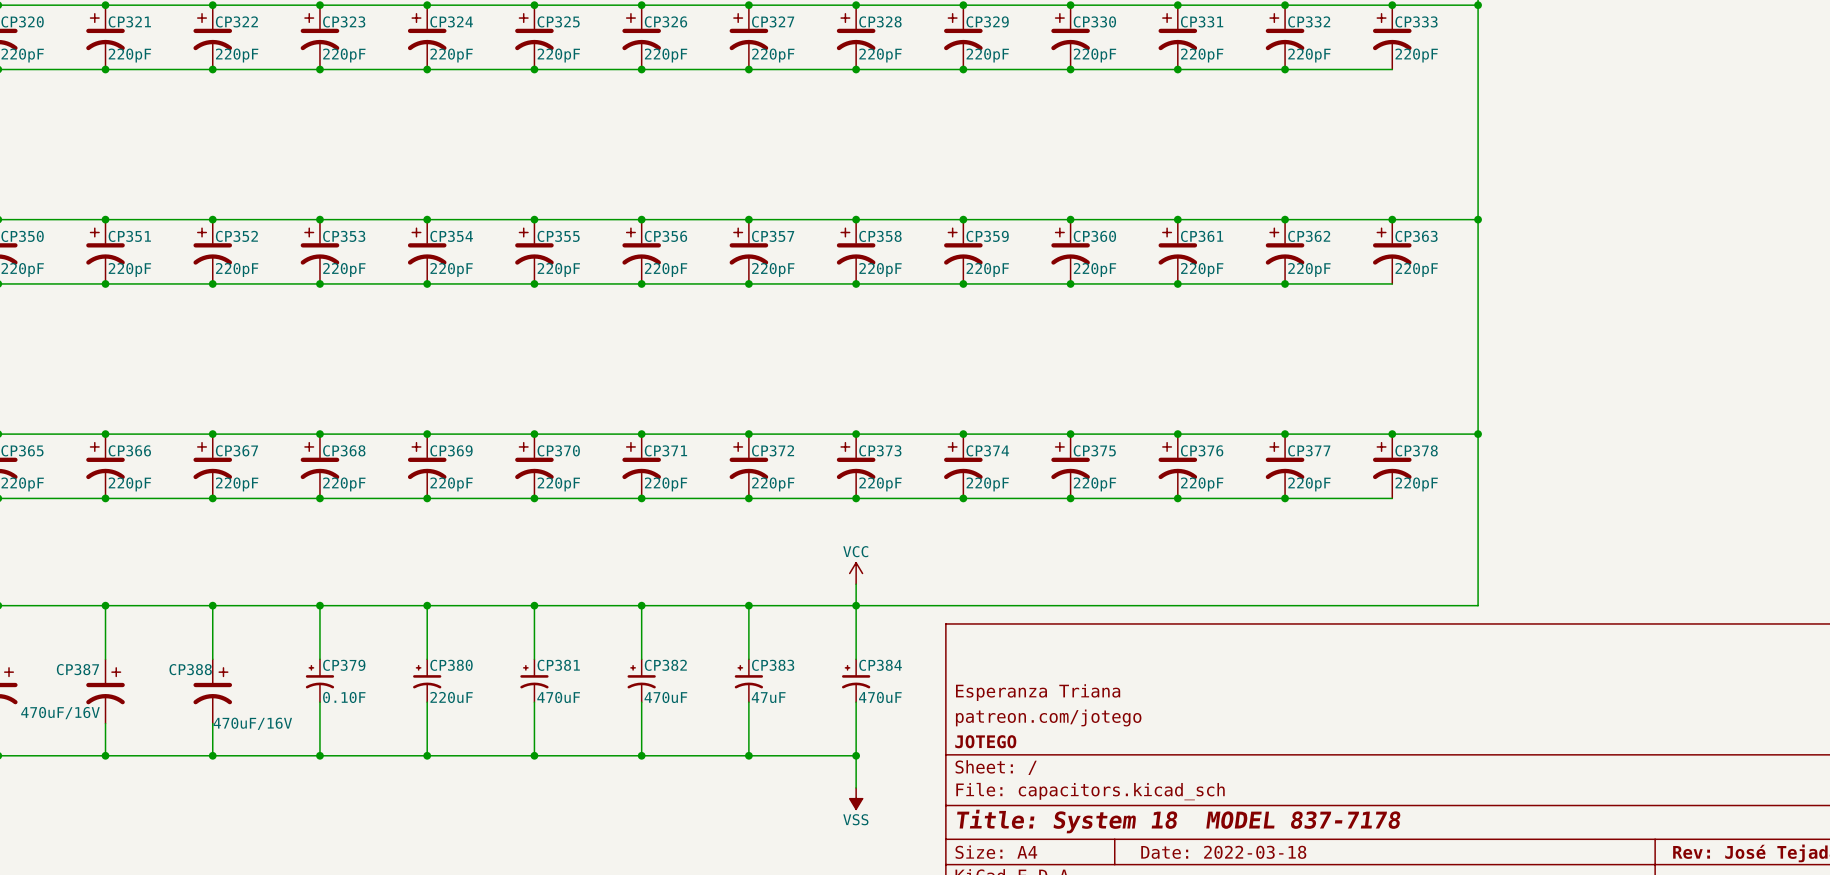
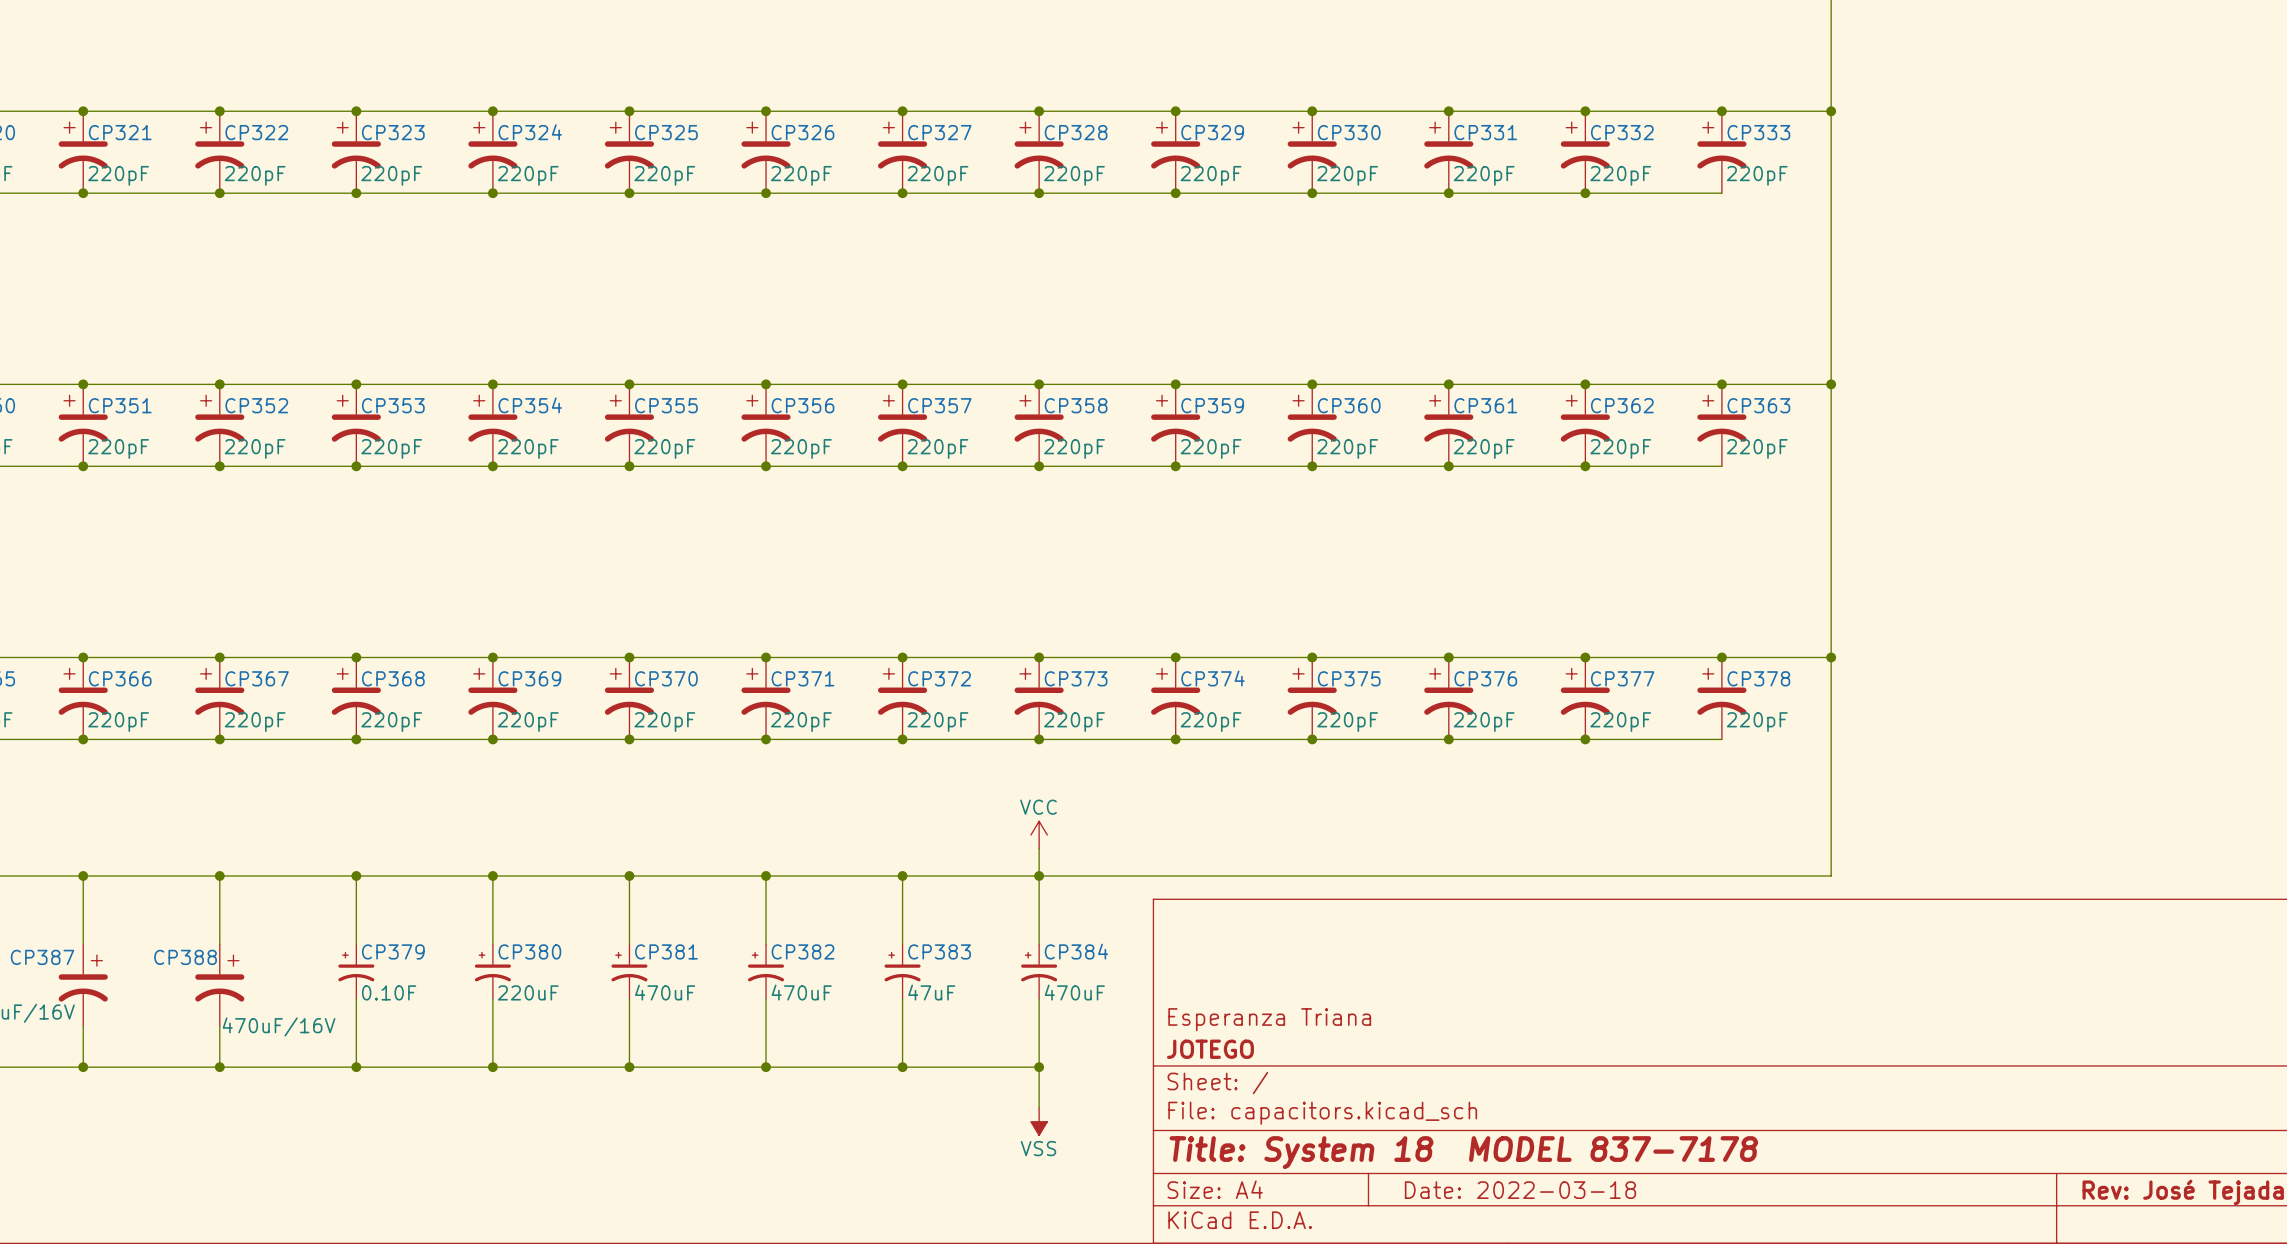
title block: Esperanza Triana (1038, 692) -> none
title block: patreon.com/jotego (1048, 717) -> Esperanza Triana (1269, 1019)

